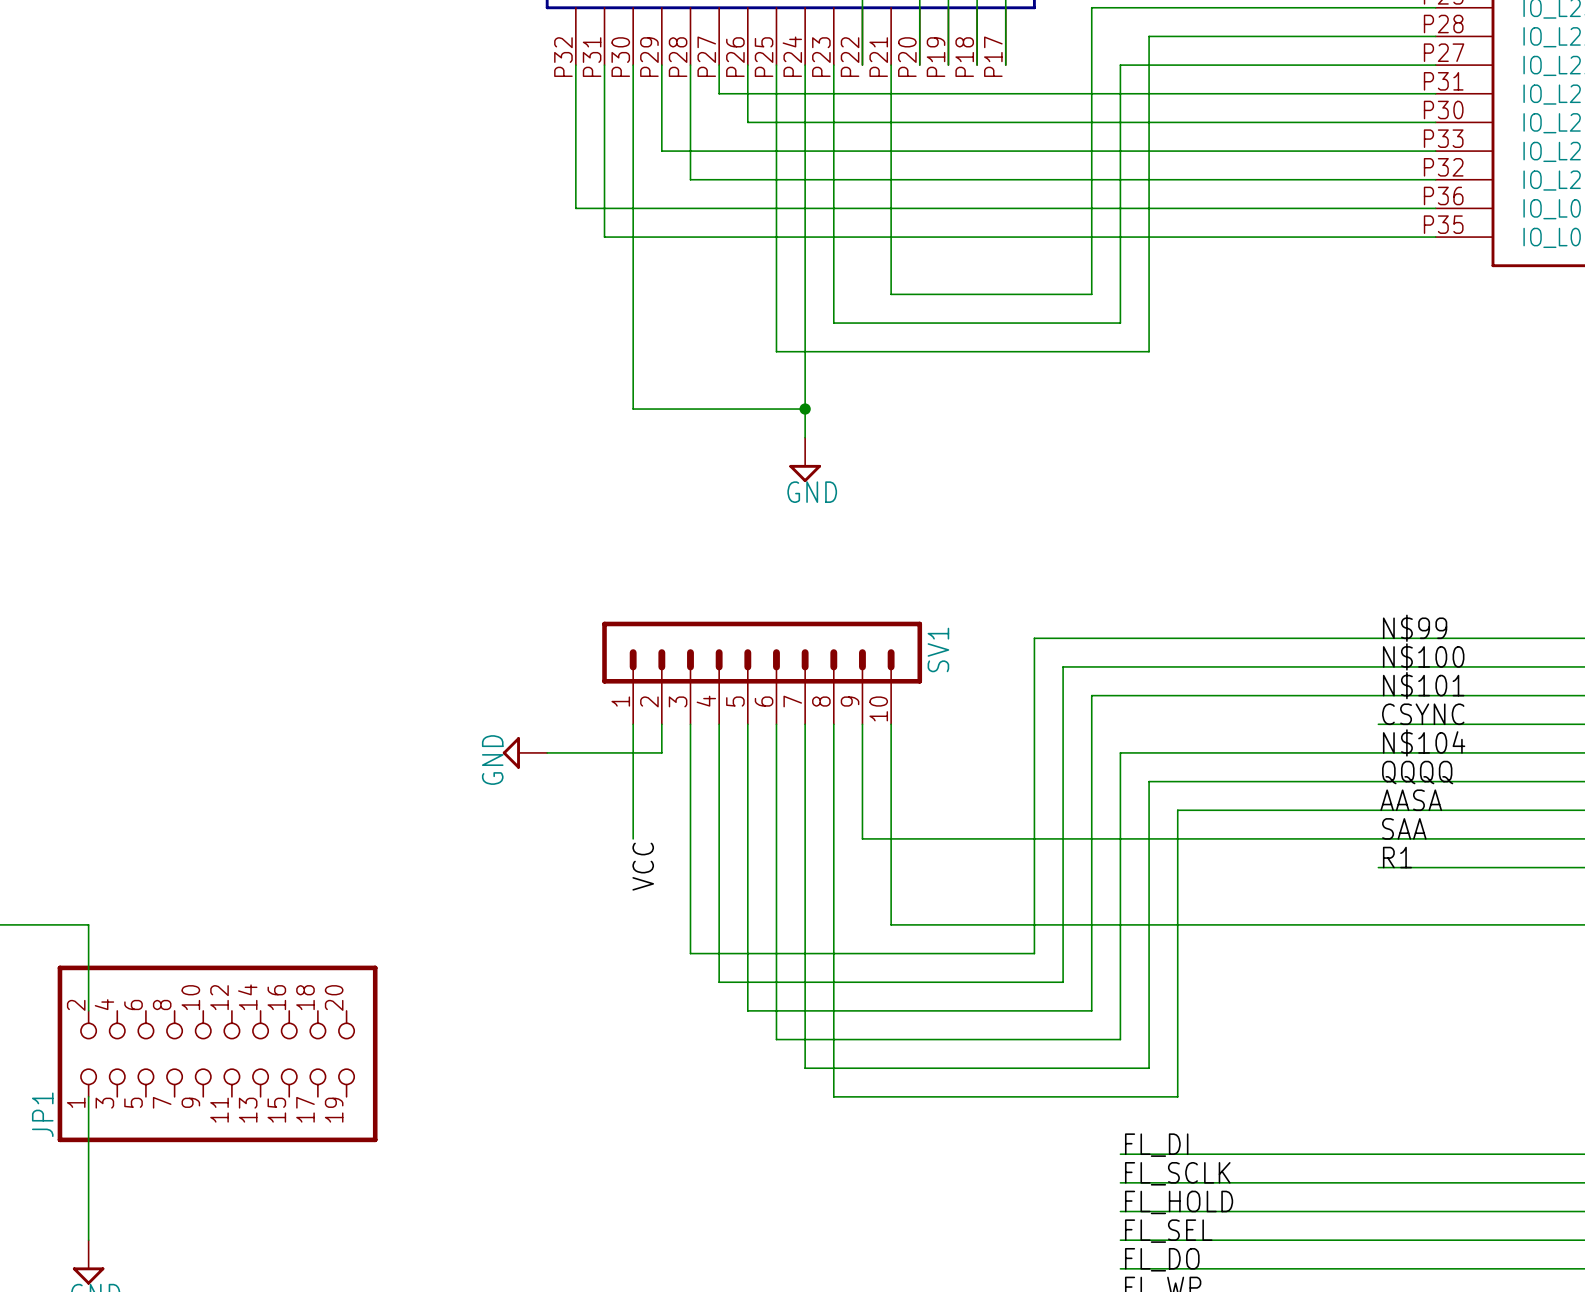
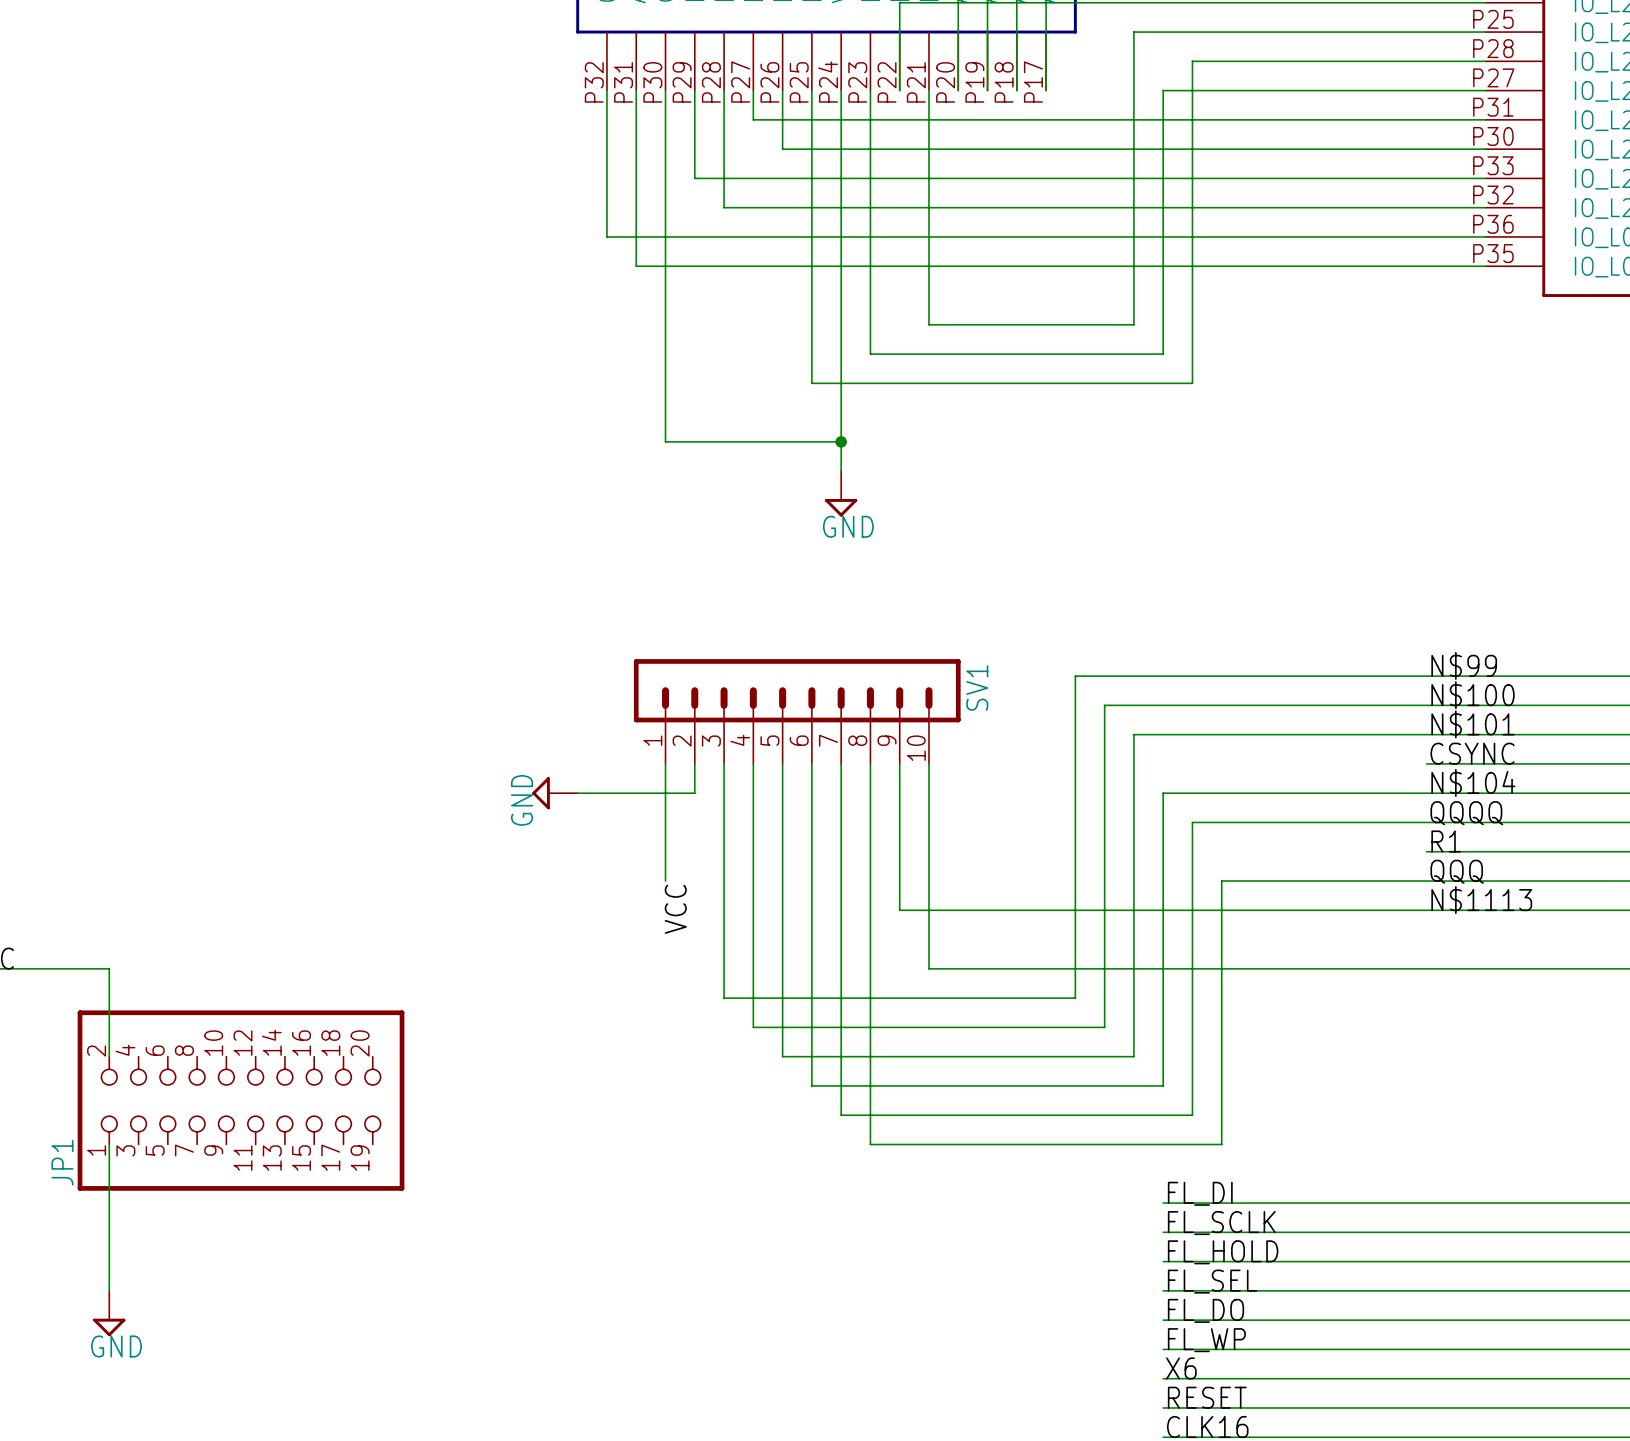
label: AASA (1411, 800) -> R1 (1446, 841)
wire: (1378, 810) (1177, 810) (1177, 838) (862, 838) -> (1426, 910) (899, 910) (899, 881)
label: SAA (1404, 828) -> QQQ (1457, 871)
label: R1 (1397, 857) -> N$1113 (1481, 900)

